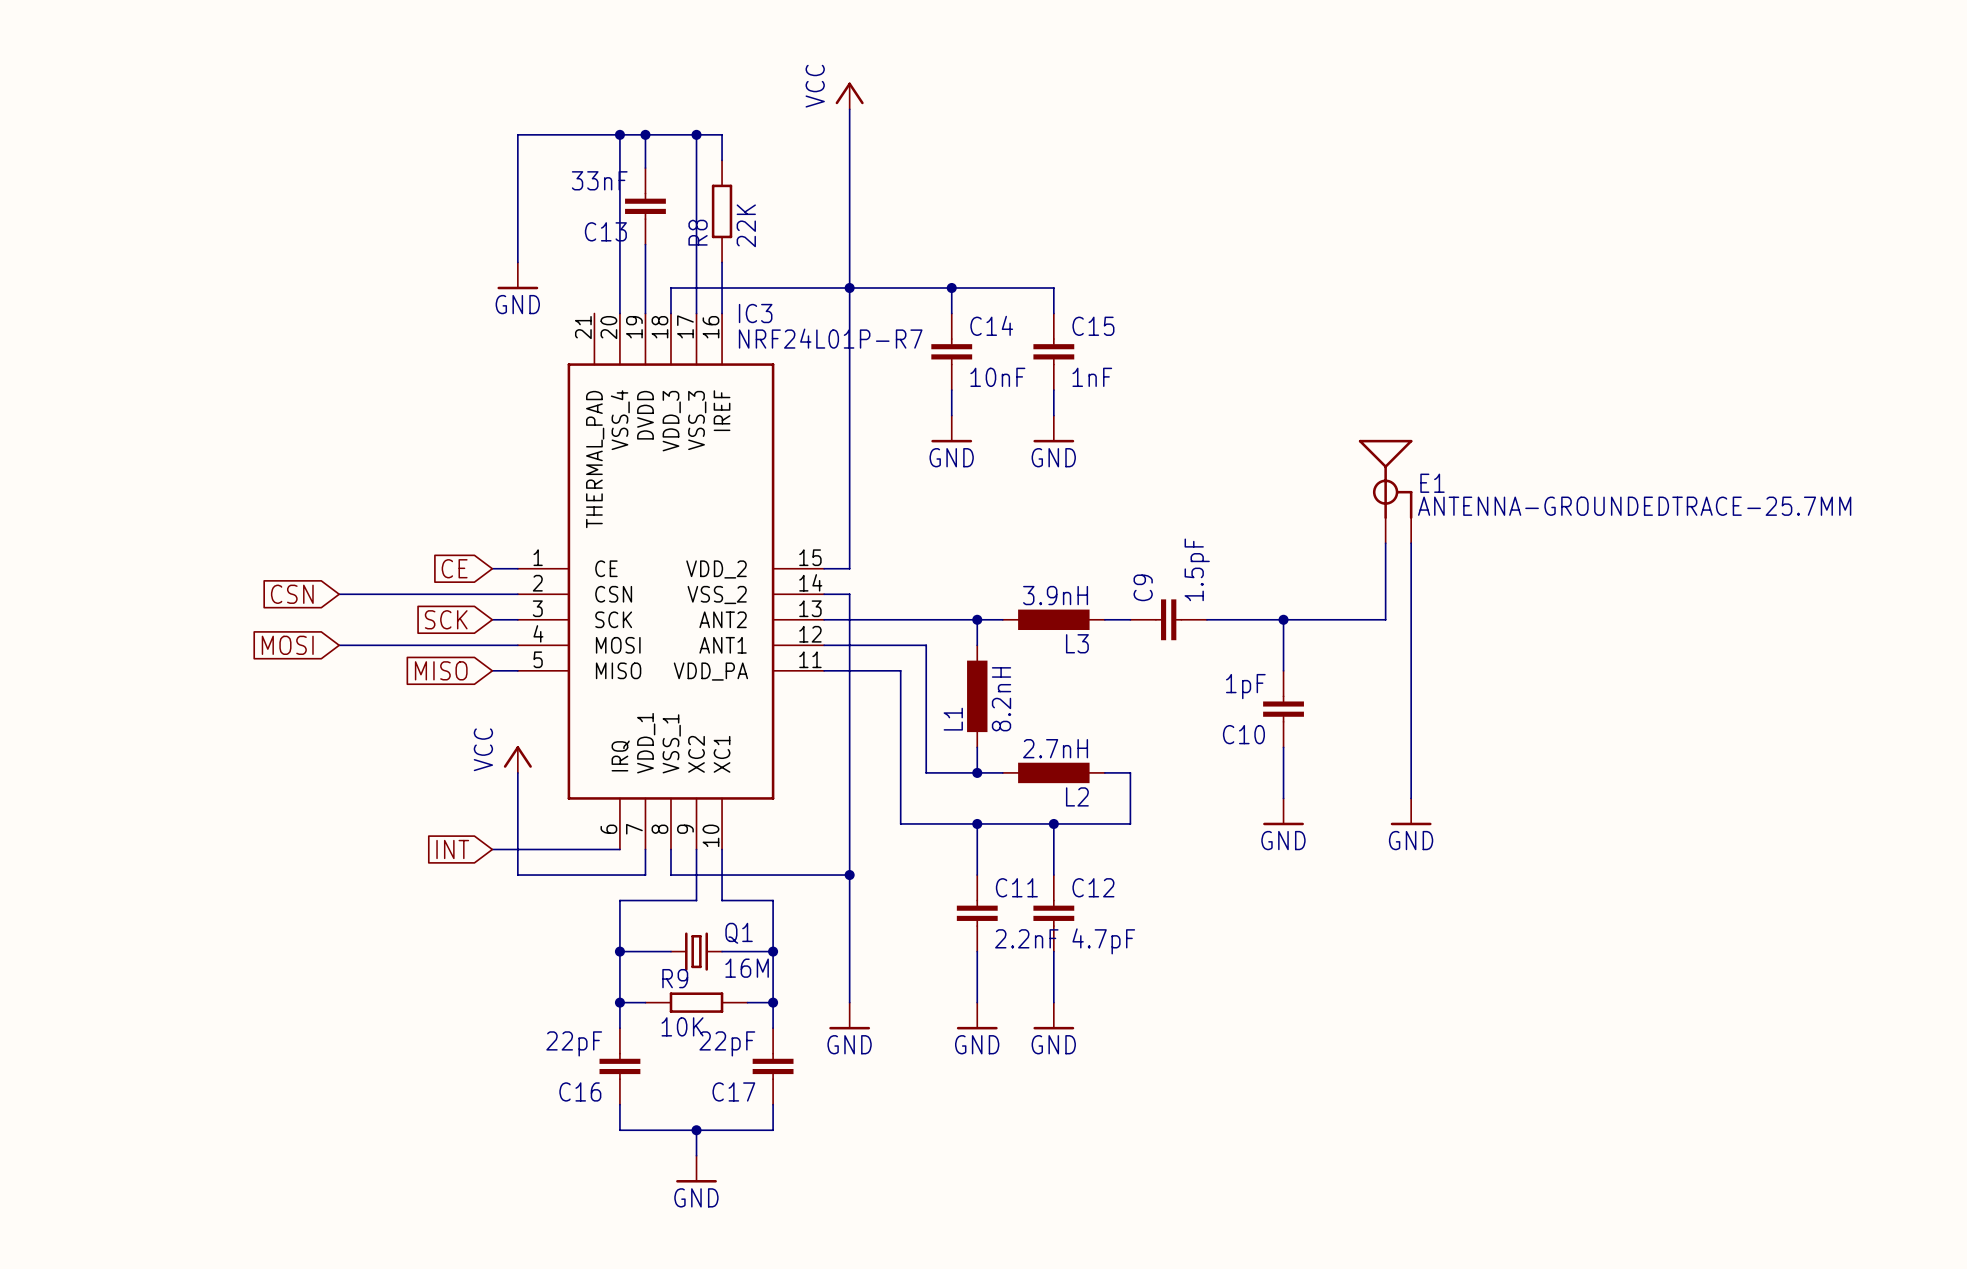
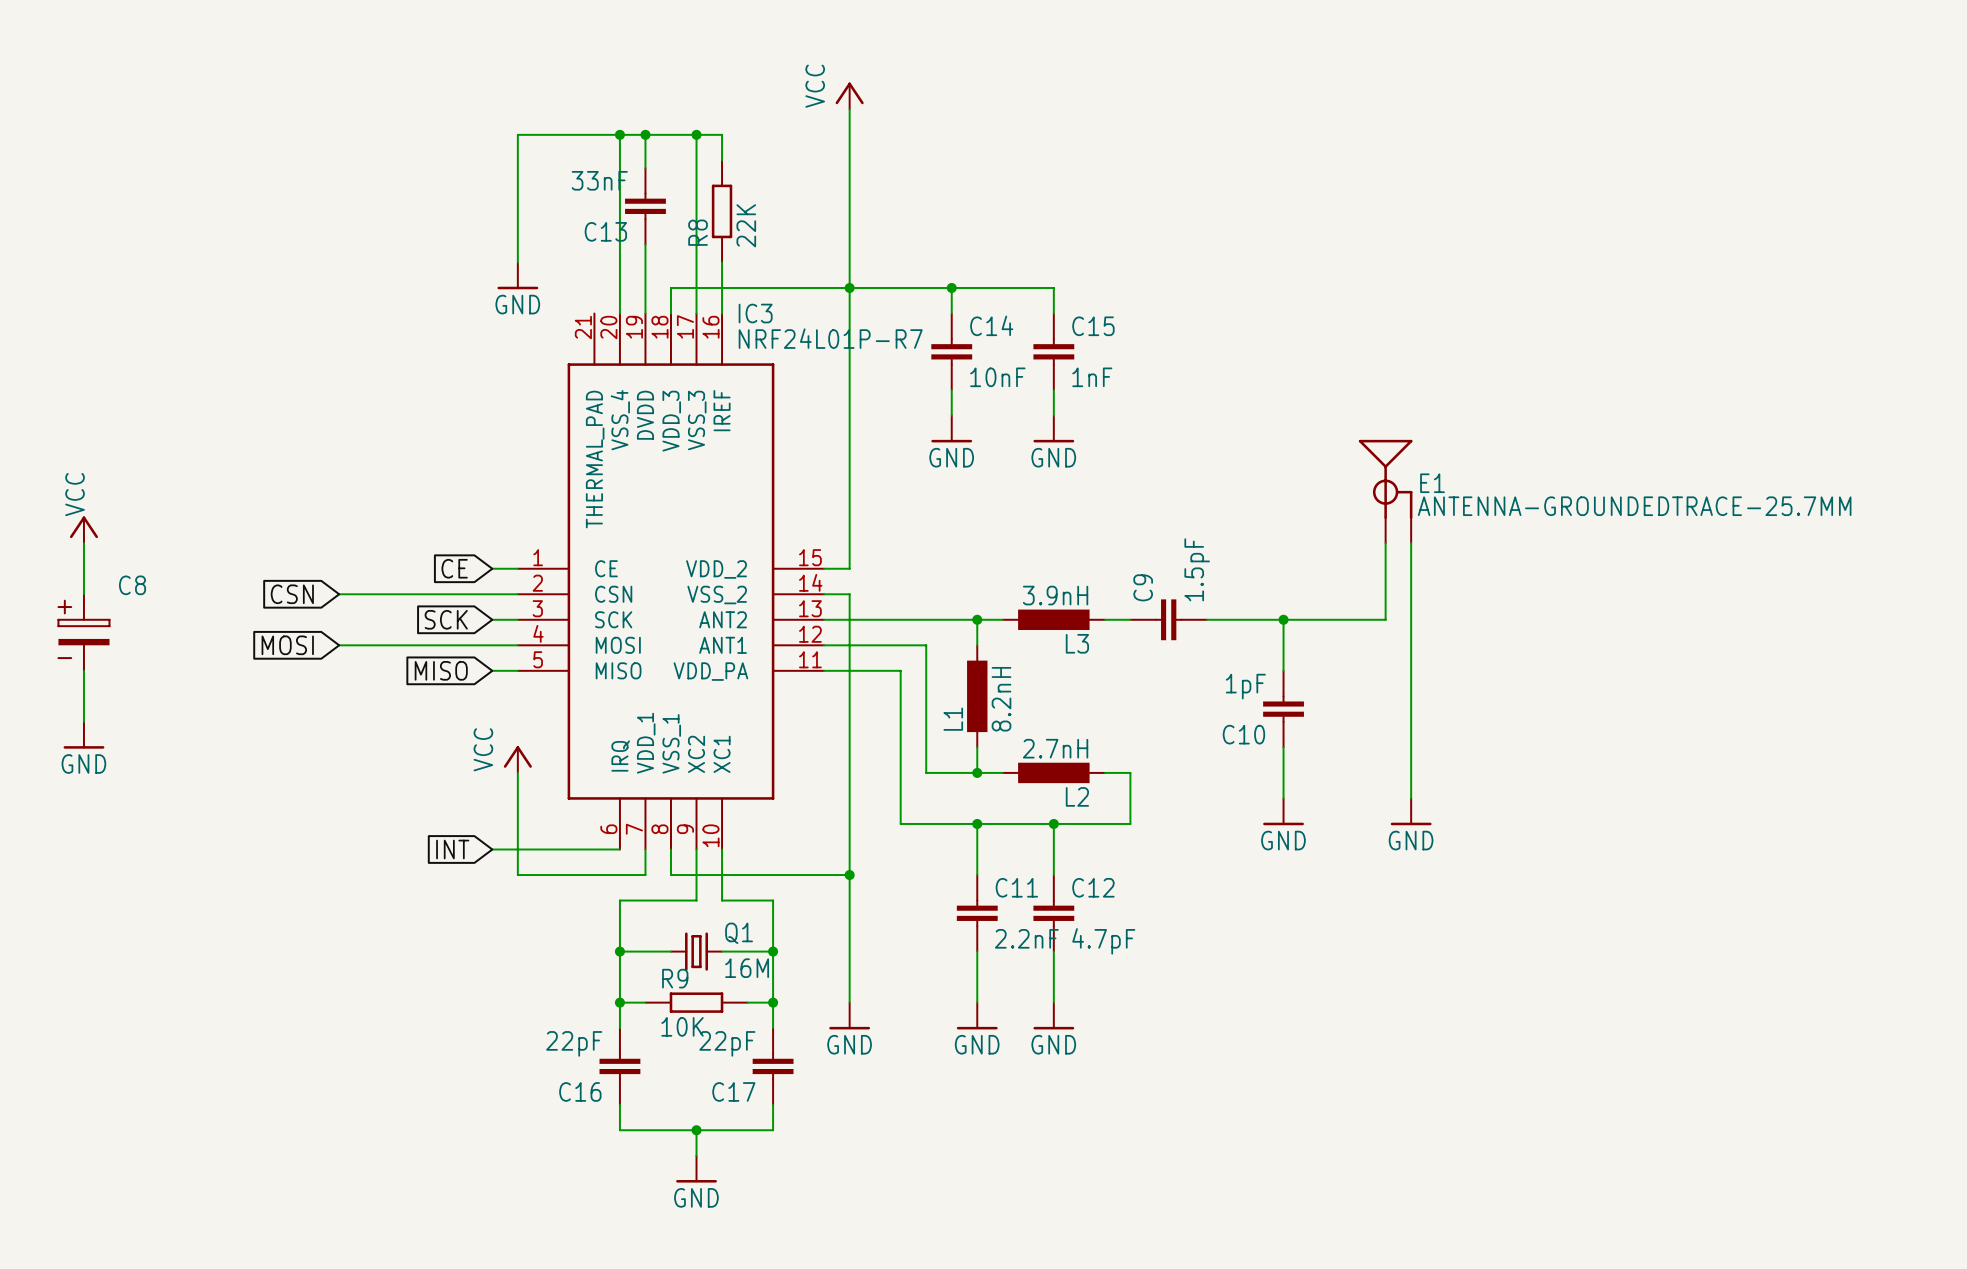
power symbol: none -> VCC (83, 529)
wire: none -> (83, 543) (83, 594)
C8: none -> (83, 632)
wire: none -> (83, 670) (83, 721)
power symbol: none -> GND (83, 735)

